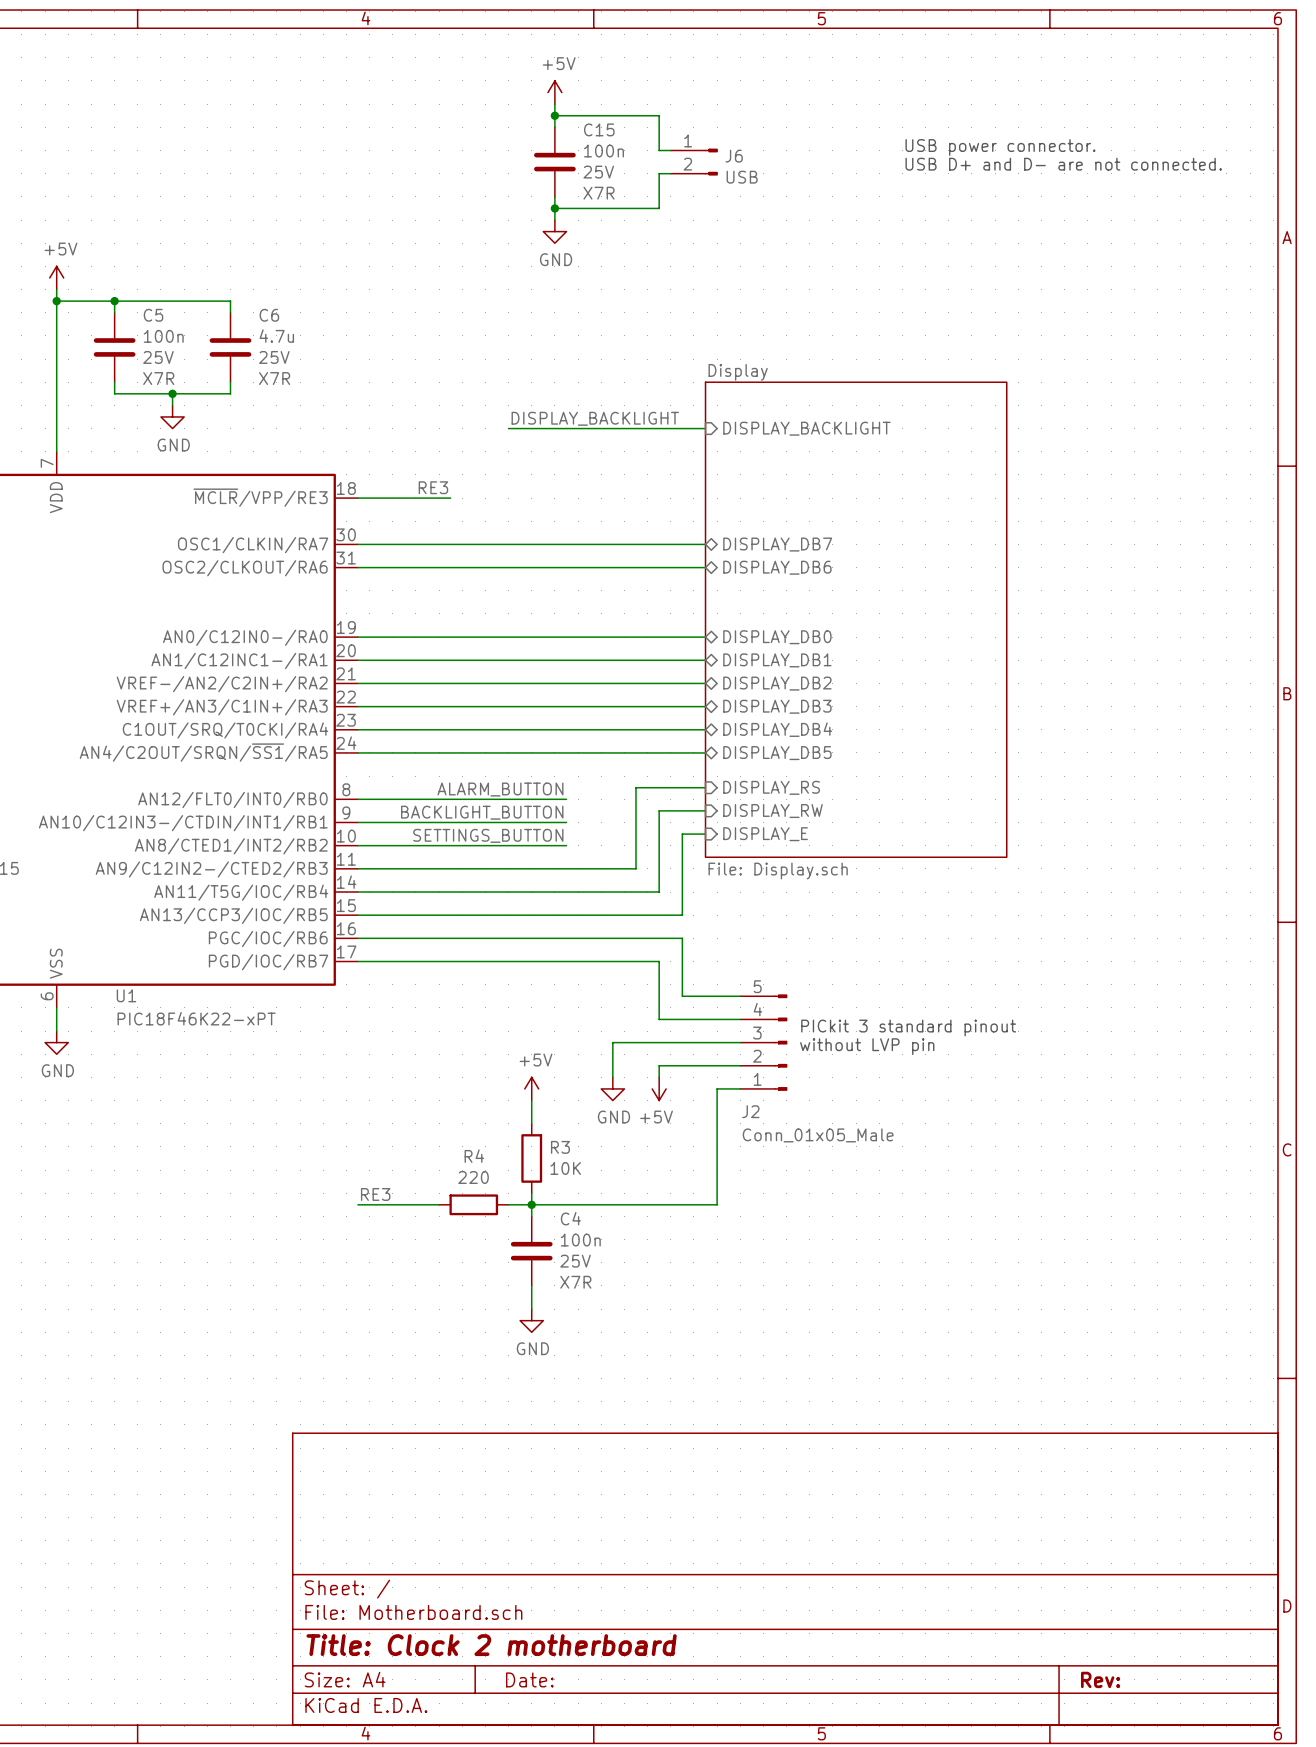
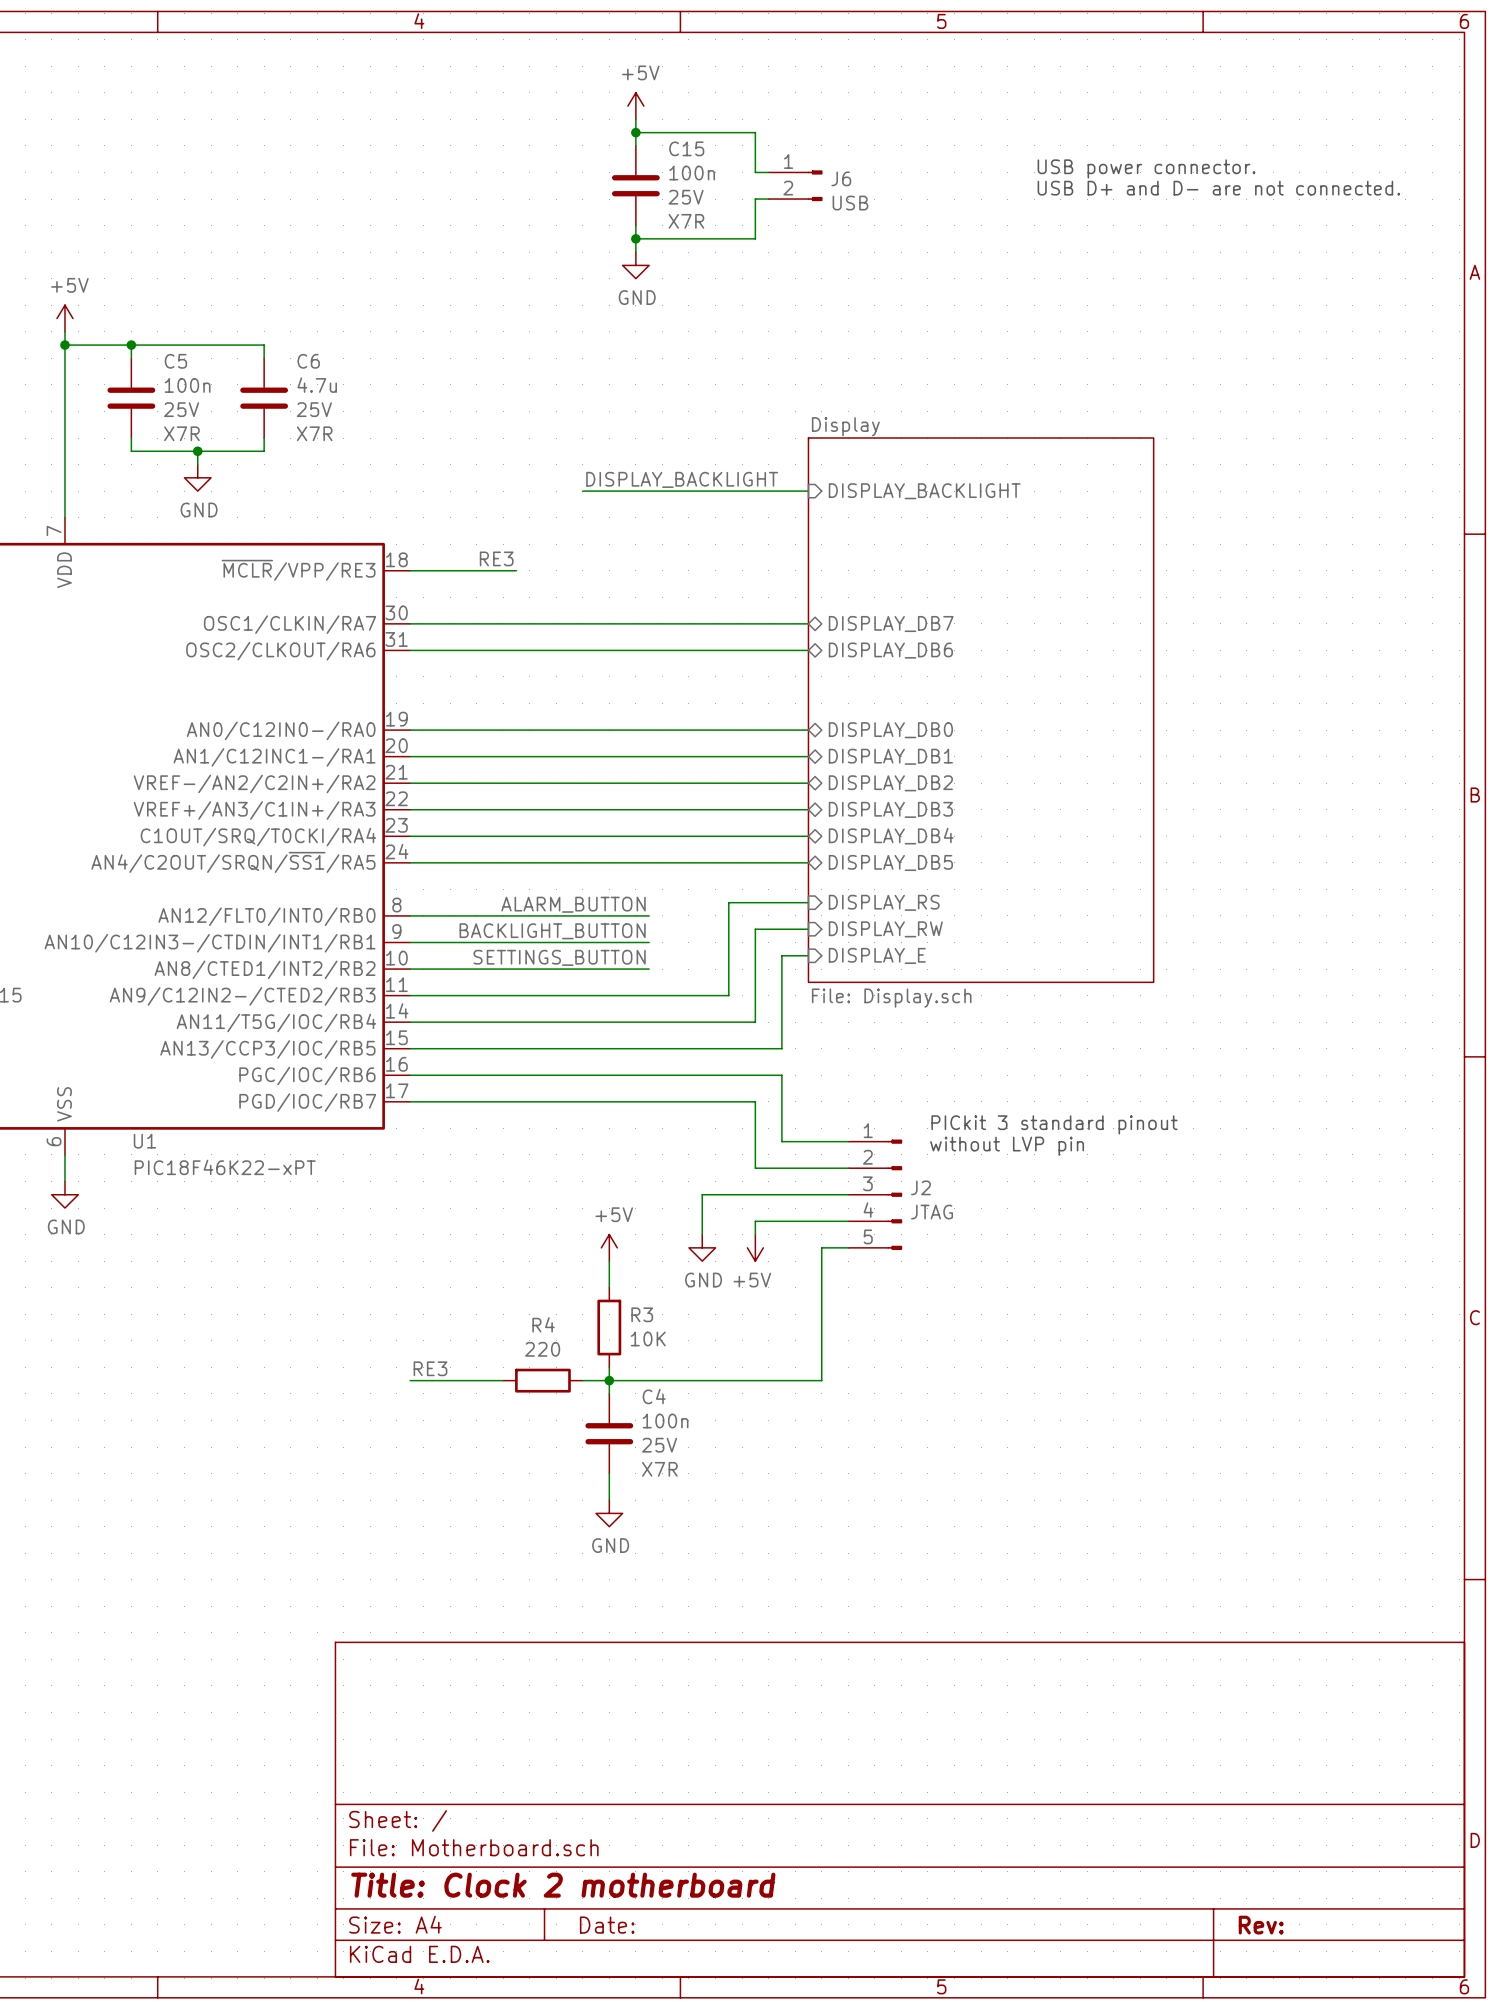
text position: PICkit 3 standard pinout (908, 1027) -> PICkit 3 standard pinout (1054, 1124)
J2 flip: as is (780, 1042) -> up-down (894, 1194)
text position: without LVP pin (867, 1046) -> without LVP pin (1007, 1146)
J2 name position: J2 (750, 1111) -> J2 (920, 1187)
J2 value: Conn_01x05_Male (818, 1135) -> JTAG (932, 1212)

